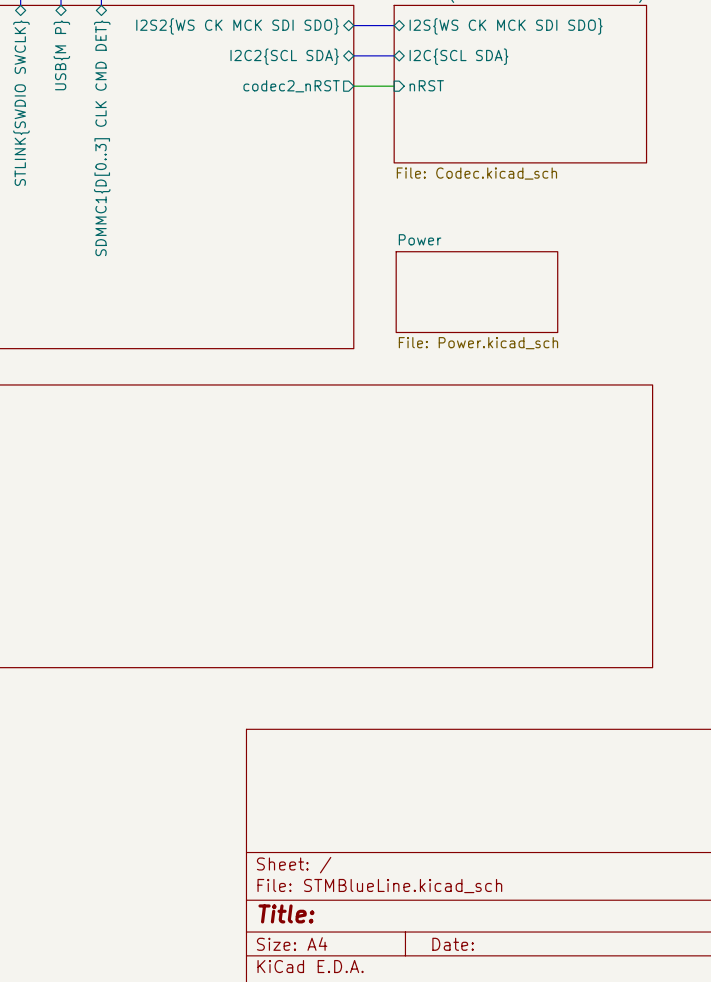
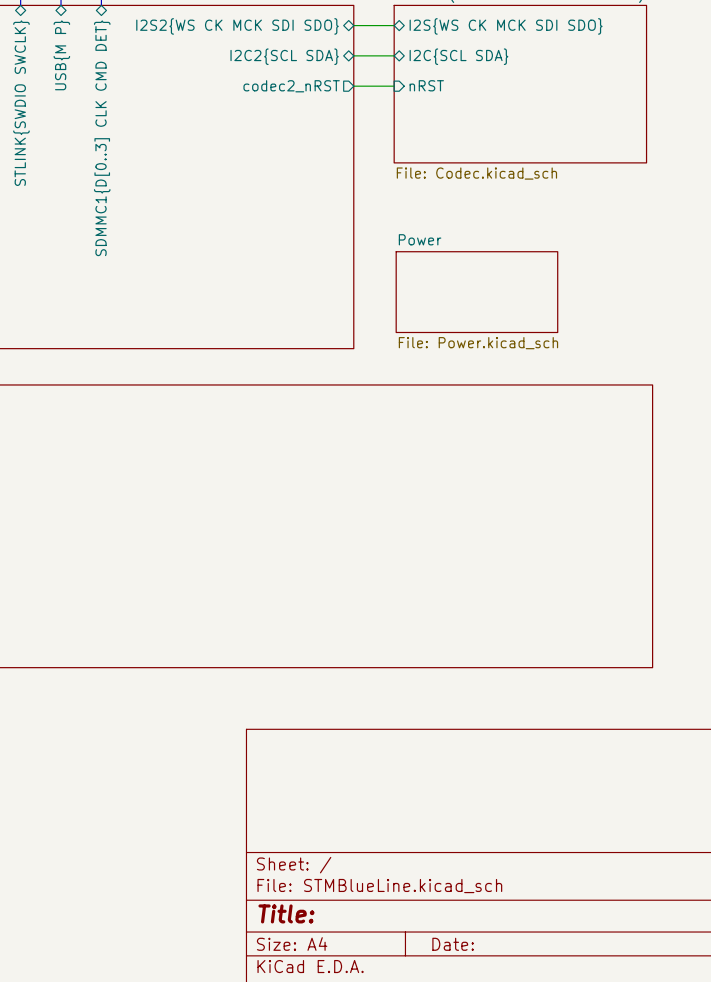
bus: (353, 25) (394, 25) -> none
bus: (353, 55) (394, 55) -> none

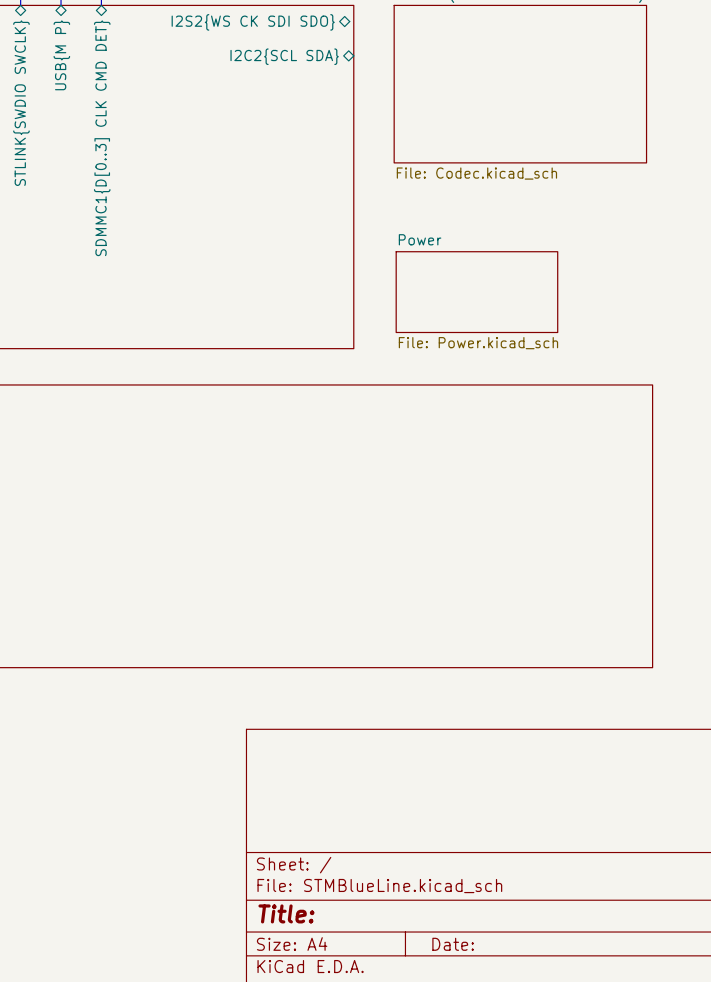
wire: (353, 25) (394, 25) -> none
sheet pin: I2S2{WS CK MCK SDI SDO} (237, 26) -> I2S2{WS CK SDI SDO} (253, 22)
sheet pin: I2S{WS CK MCK SDI SDO} (506, 26) -> none
wire: (353, 55) (394, 55) -> none
sheet pin: I2C{SCL SDA} (458, 56) -> none
sheet pin: nRST (426, 85) -> none
sheet pin: codec2_nRST (291, 86) -> none
wire: (353, 86) (394, 86) -> none

